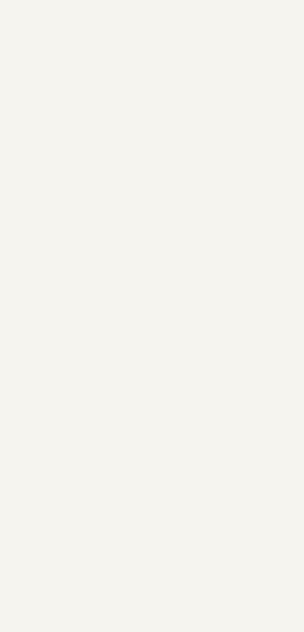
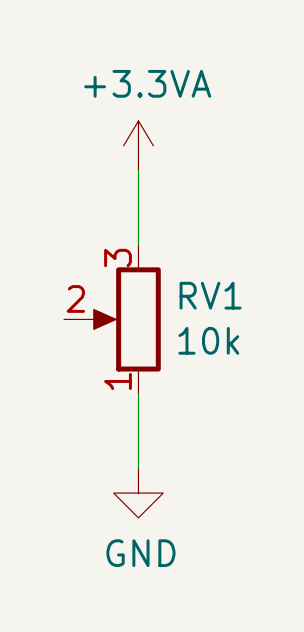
power symbol: none -> +3.3VA (138, 145)
wire: none -> (138, 170) (138, 245)
RV1: none -> 10k (112, 319)
wire: none -> (138, 393) (138, 468)
power symbol: none -> GND (138, 493)

